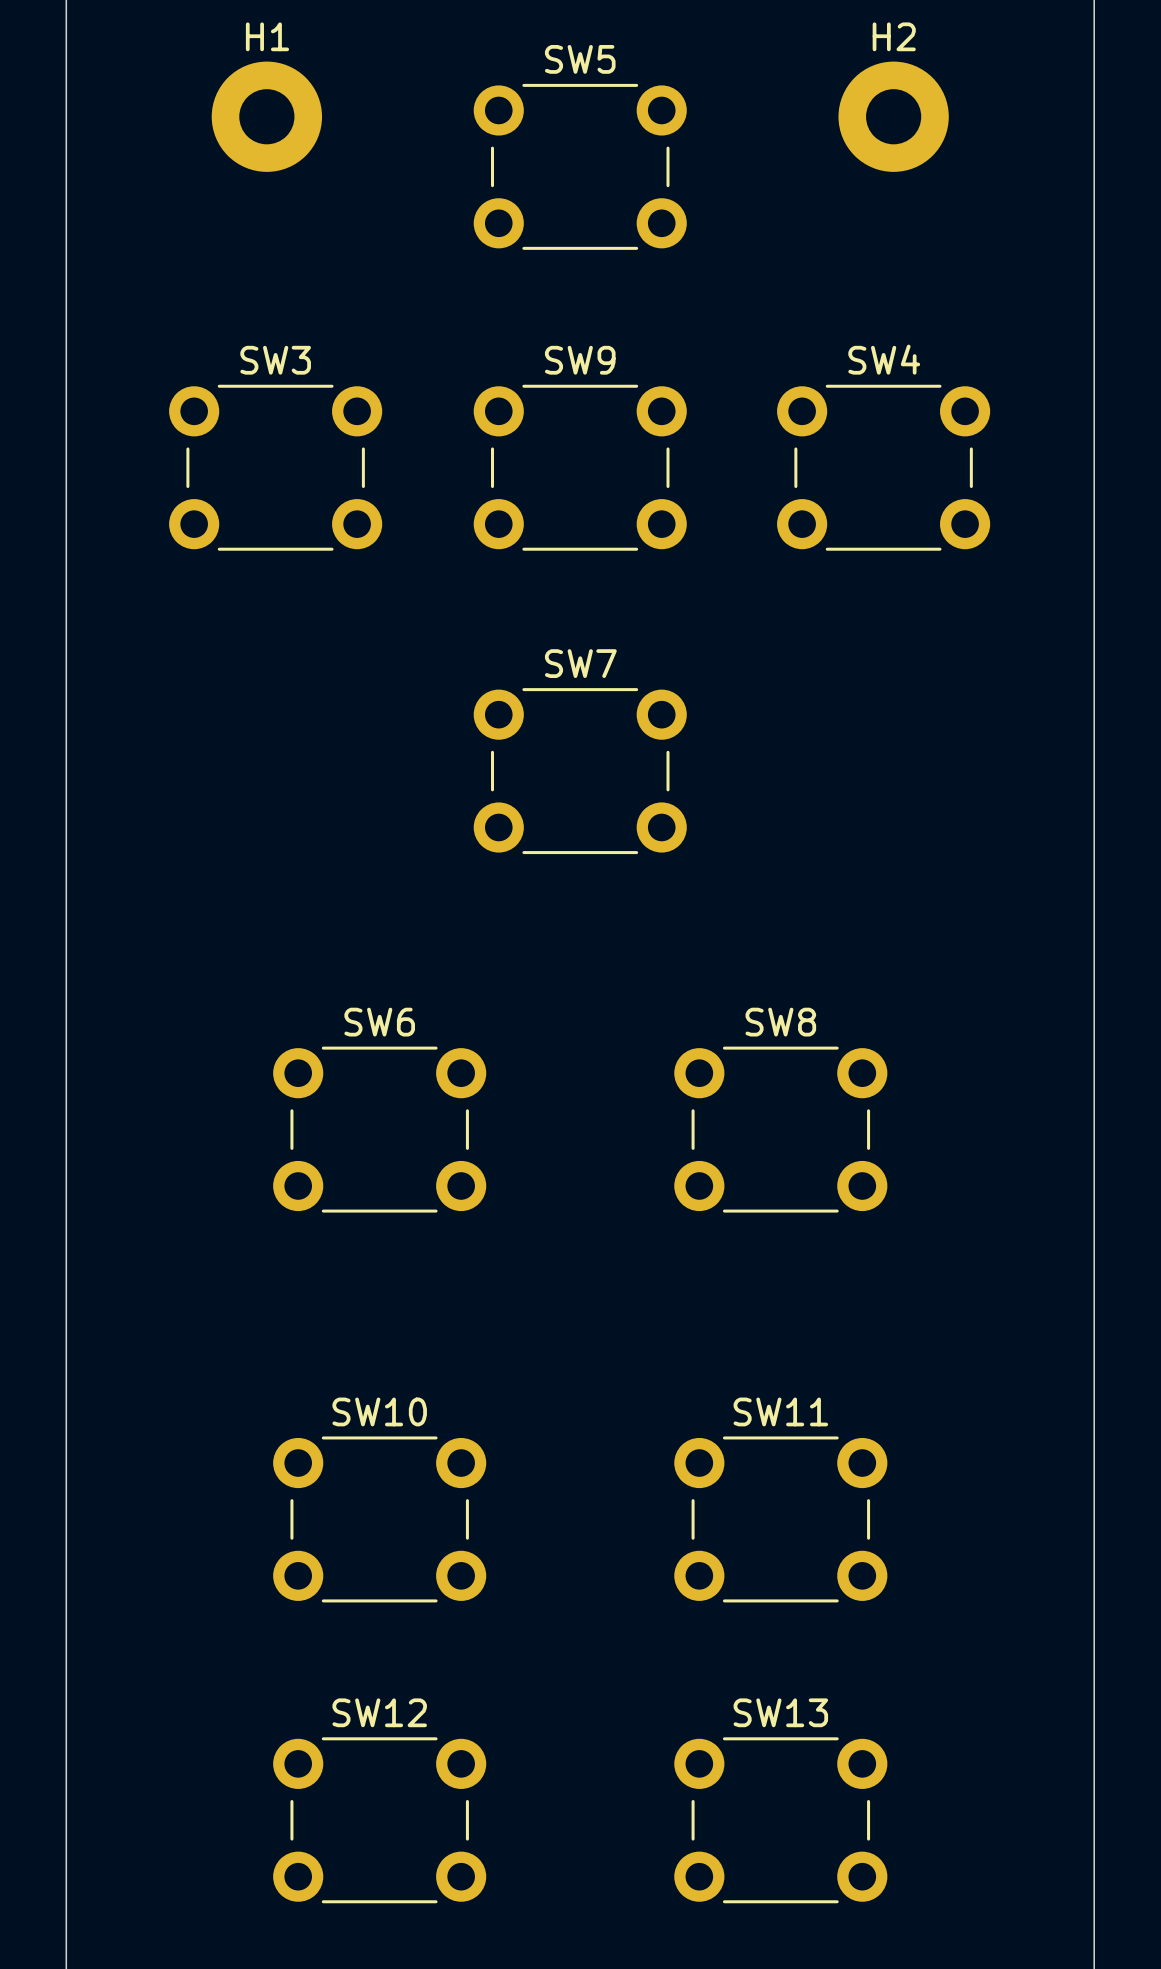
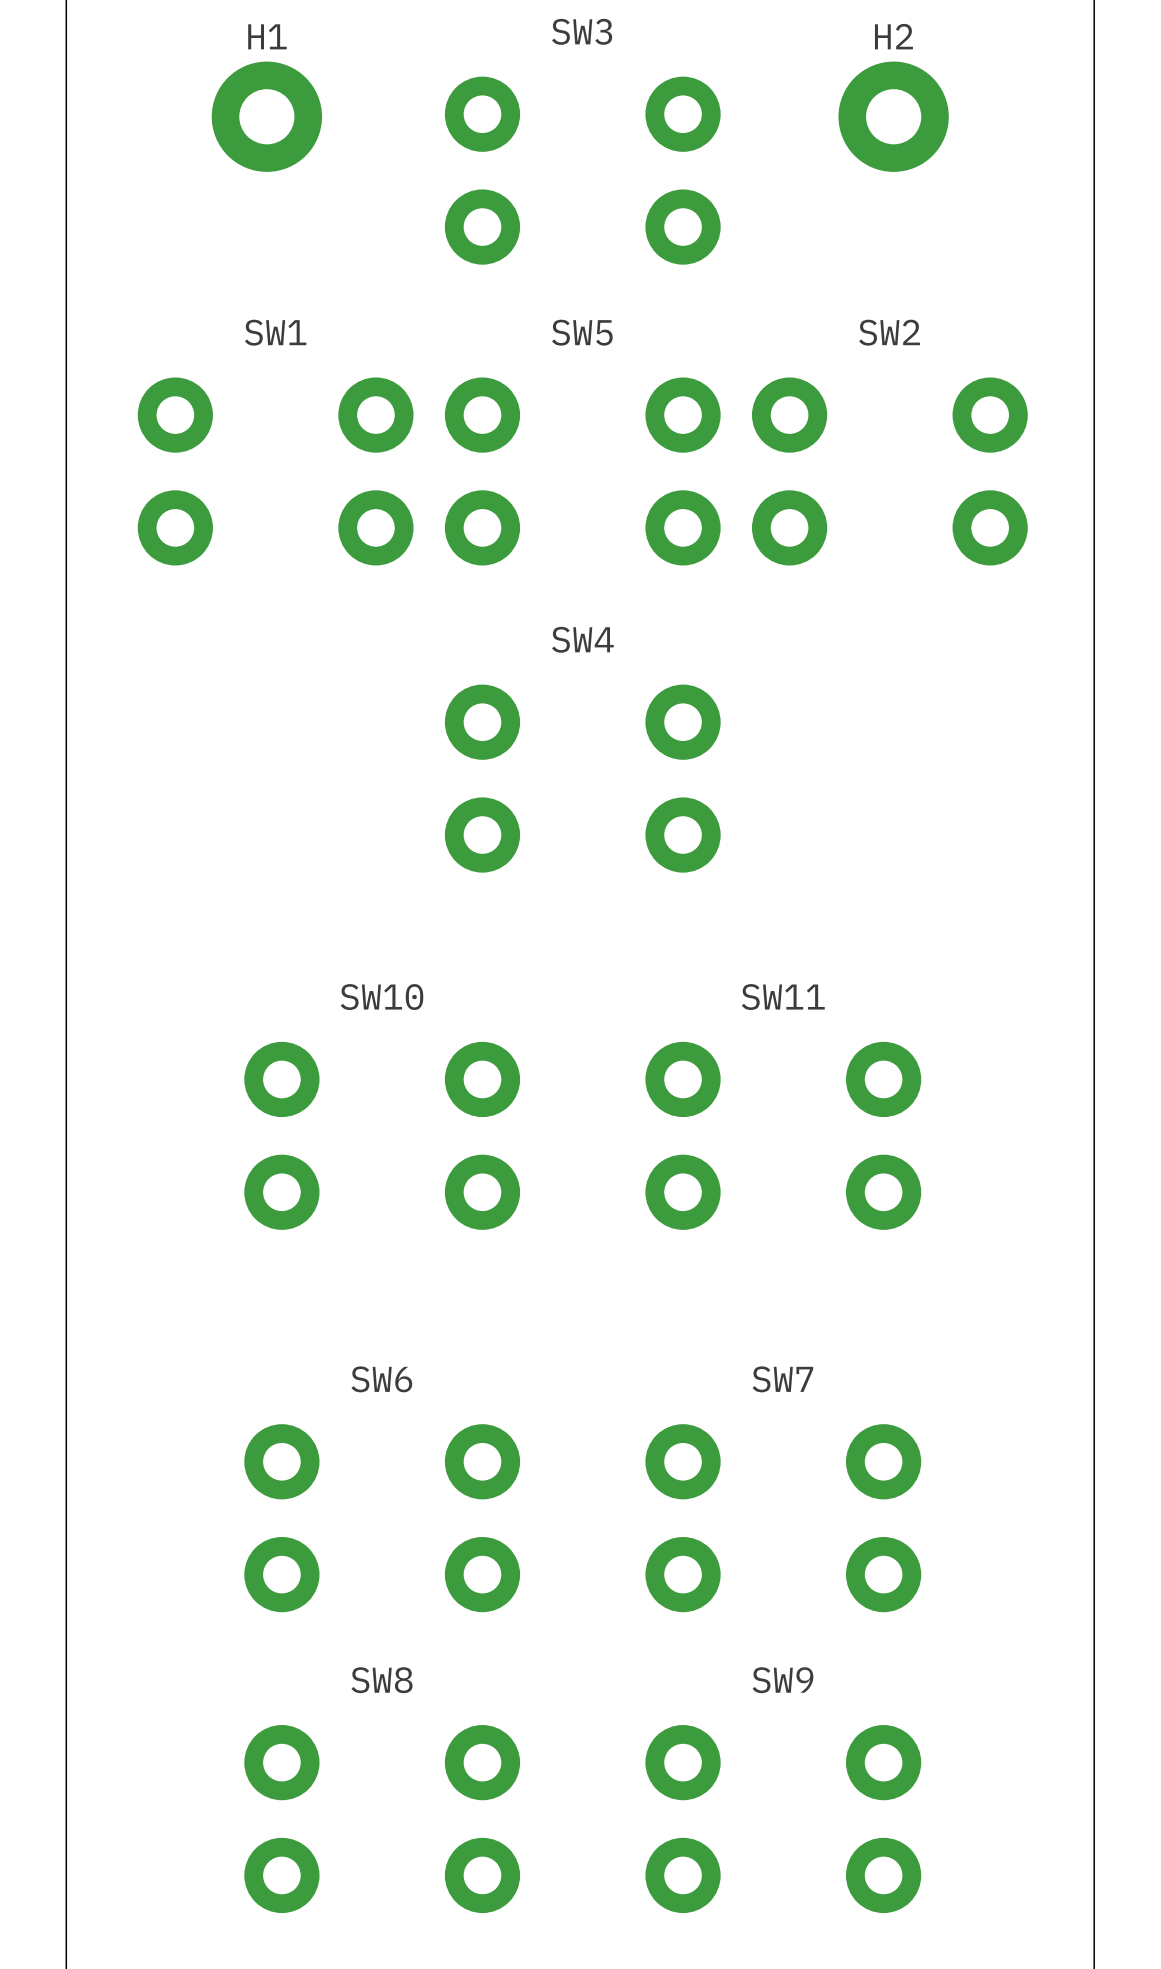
SW5 footprint: [473, 83, 687, 250] -> [444, 377, 721, 566]
SW3 footprint: [169, 384, 383, 551] -> [444, 76, 721, 265]
SW9 footprint: [473, 384, 687, 551] -> [645, 1725, 922, 1914]
SW4 footprint: [777, 384, 991, 551] -> [444, 684, 721, 873]
SW1: none -> (275, 471)
SW2: none -> (889, 471)
SW7 footprint: [473, 688, 687, 855] -> [645, 1424, 922, 1613]
SW6 footprint: [273, 1046, 487, 1213] -> [244, 1424, 521, 1613]
SW8 footprint: [674, 1046, 888, 1213] -> [244, 1725, 521, 1914]
SW10 footprint: [273, 1436, 487, 1603] -> [244, 1041, 521, 1230]
SW11 footprint: [674, 1436, 888, 1603] -> [645, 1041, 922, 1230]
SW12: (379, 1820) -> none
SW13: (780, 1820) -> none

